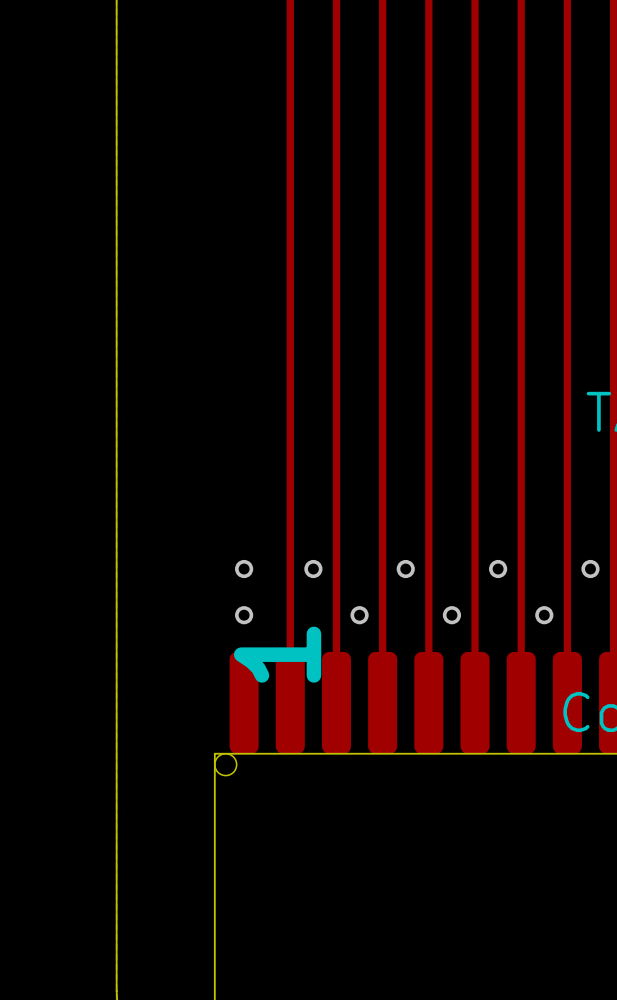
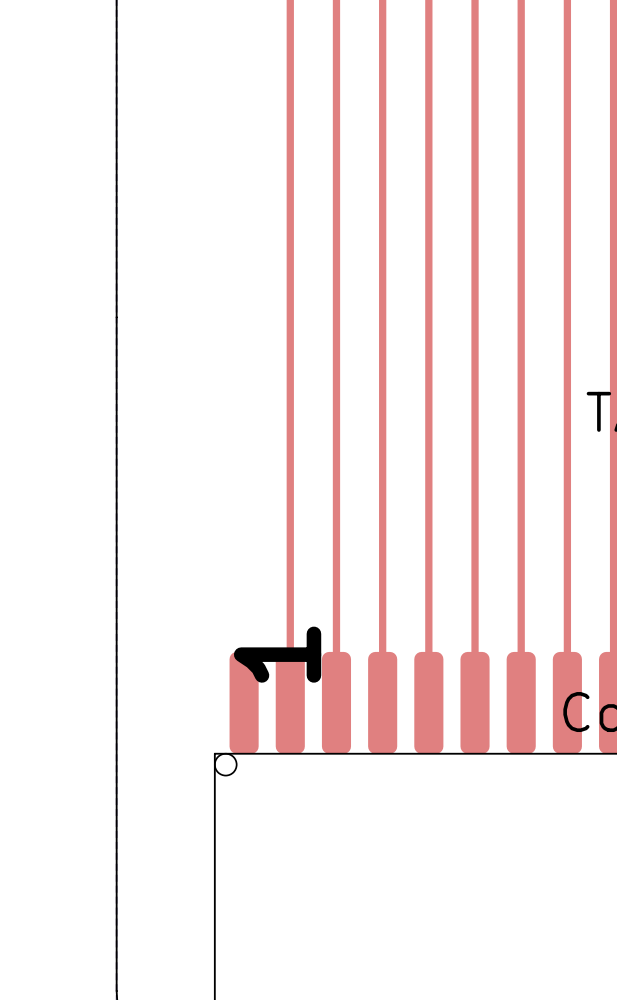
via: (244, 569) -> none
via: (313, 569) -> none
via: (405, 569) -> none
via: (498, 569) -> none
via: (590, 569) -> none
via: (244, 615) -> none
via: (359, 615) -> none
via: (451, 615) -> none
via: (544, 615) -> none

